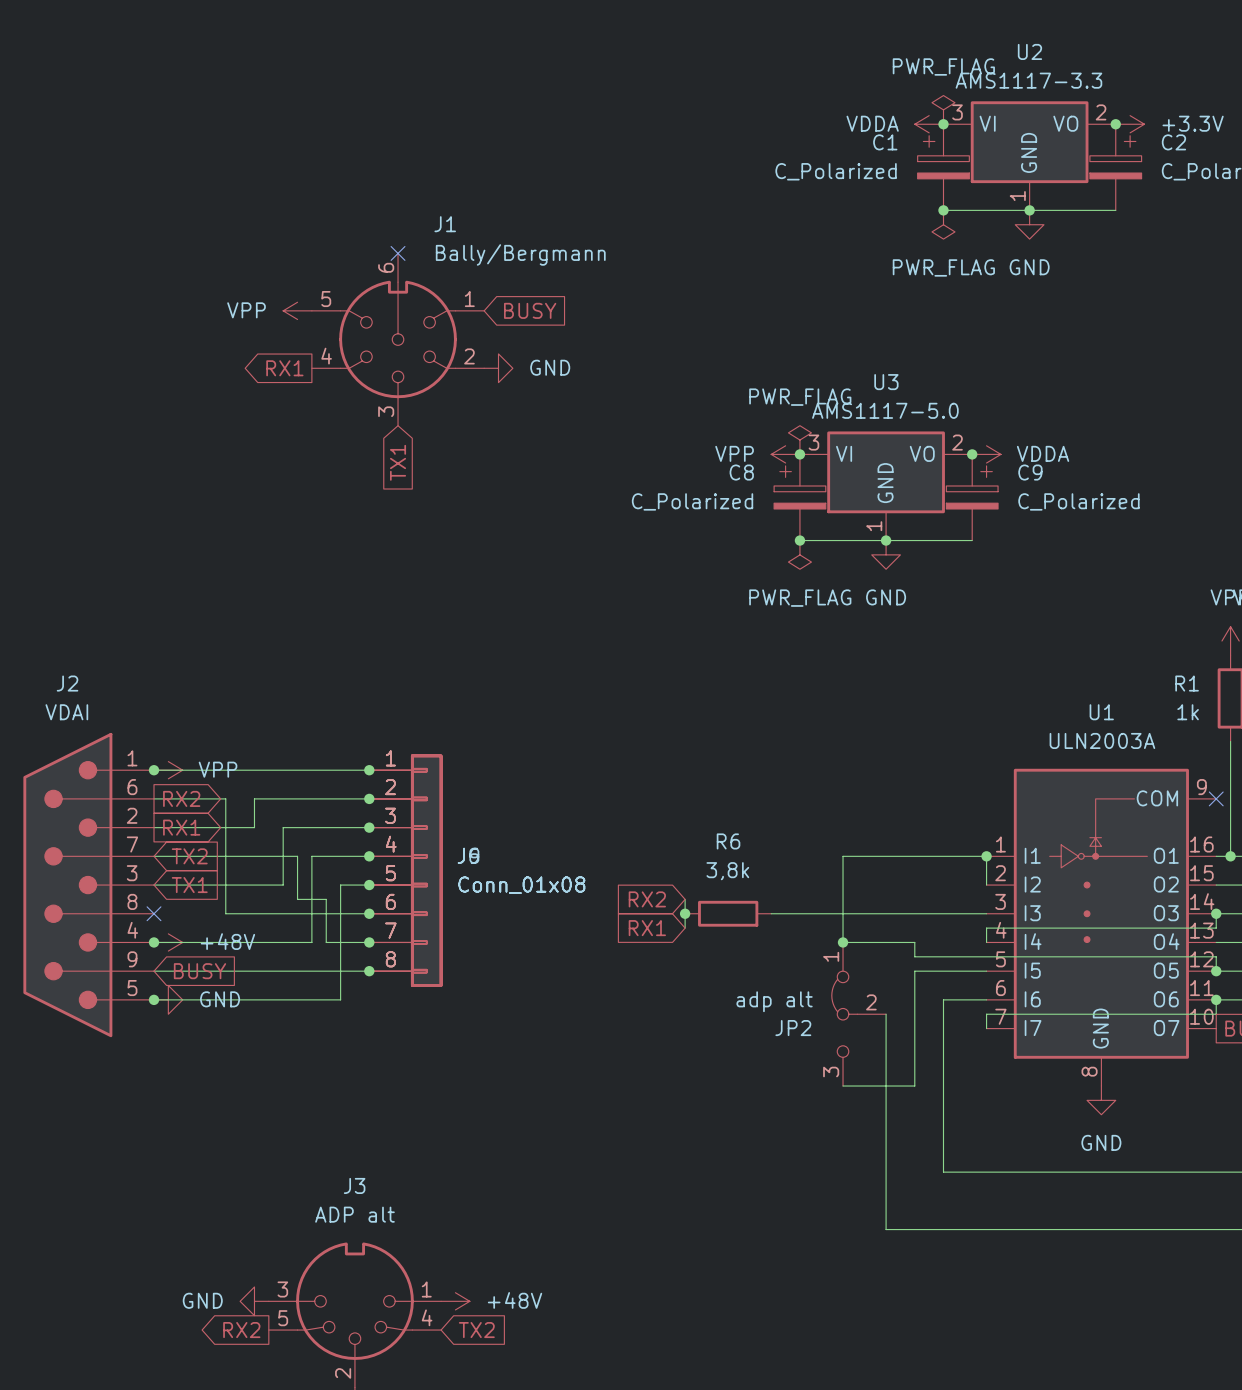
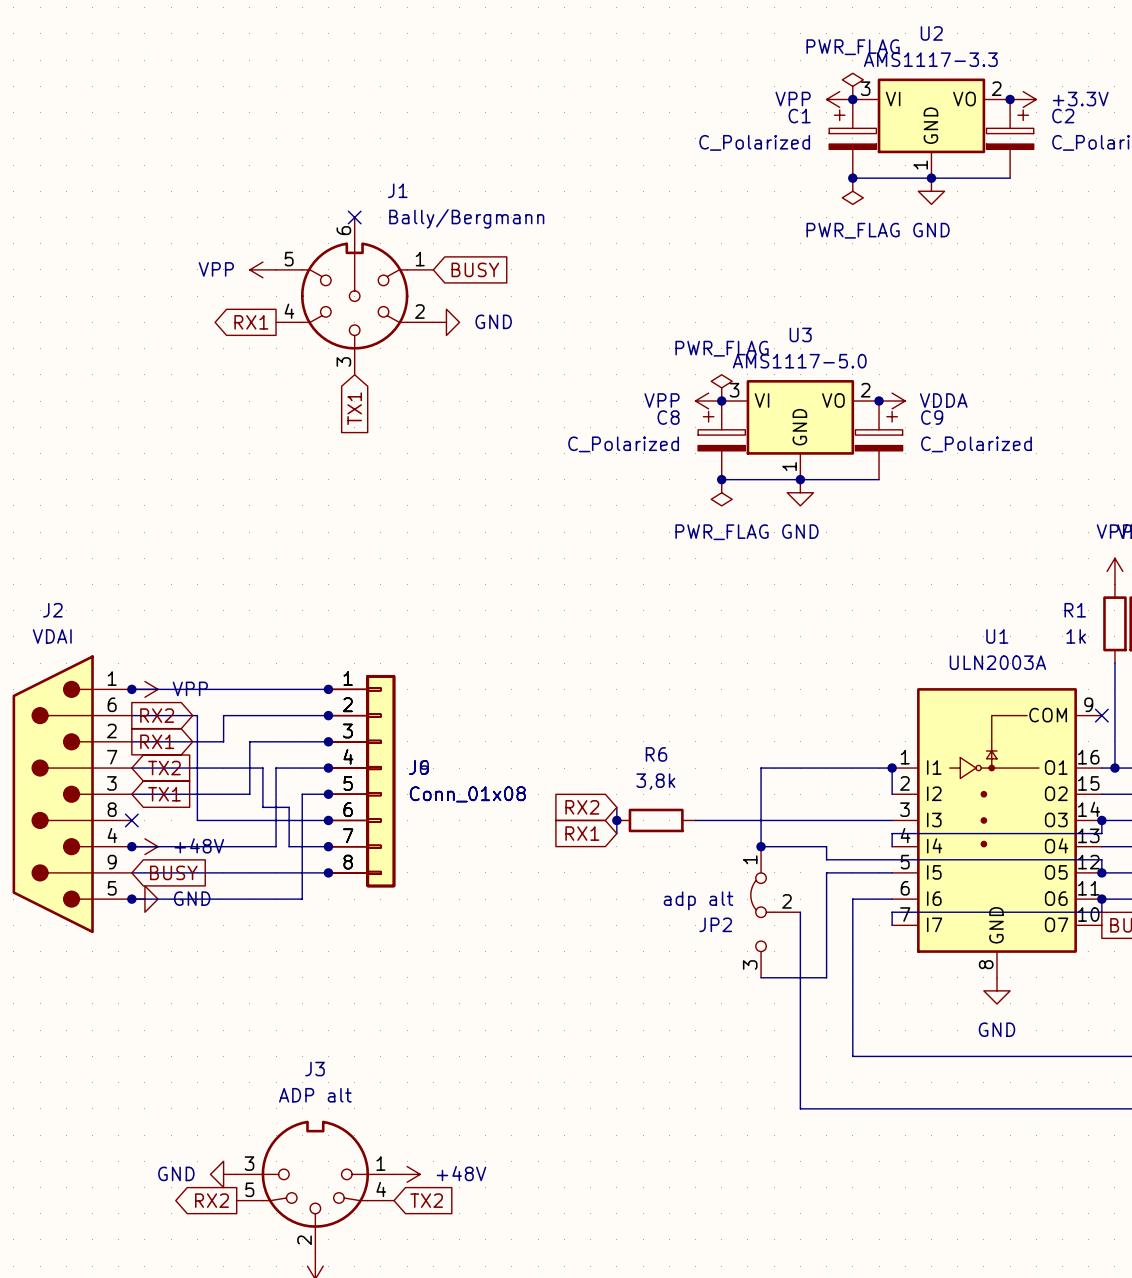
power symbol: VDDA (929, 124) -> VPP (839, 99)

